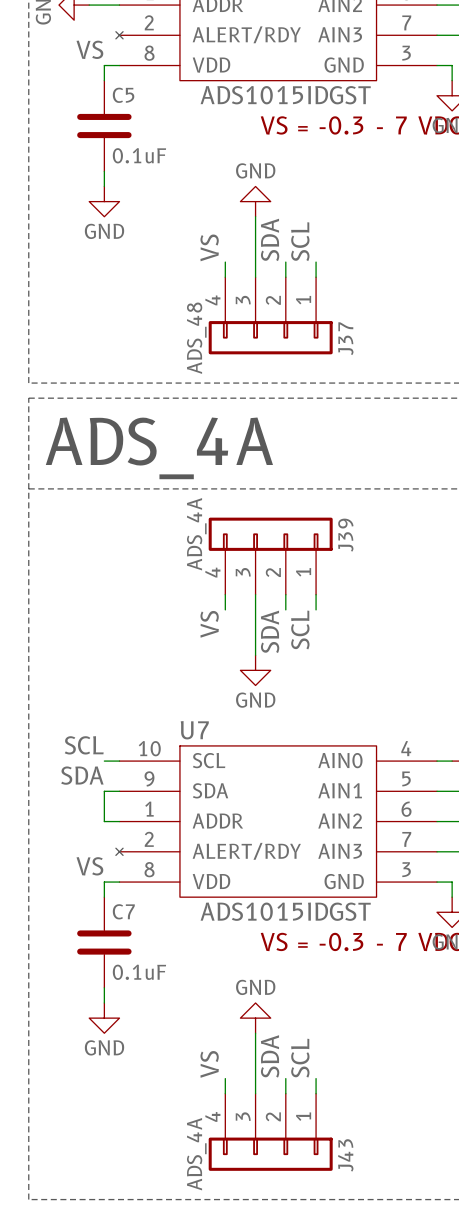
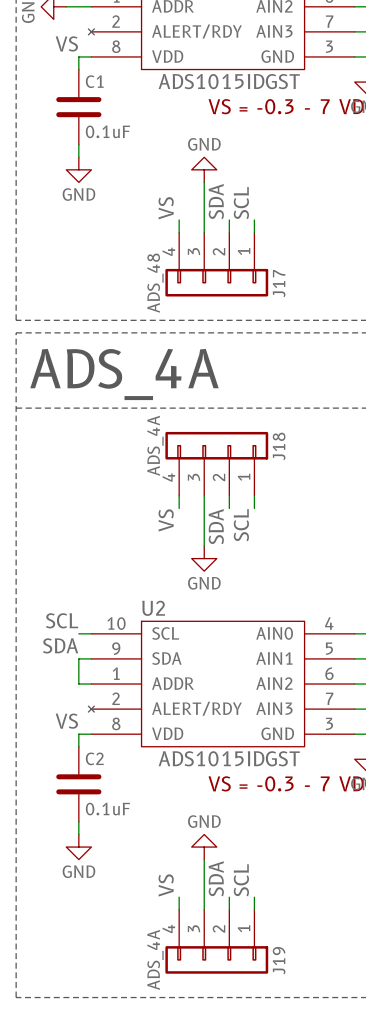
C5 name: C5 (123, 95) -> C1 (94, 81)
J37 name: J37 (345, 338) -> J17 (279, 283)
J39 name: J39 (345, 535) -> J18 (279, 446)
U7 name: U7 (194, 730) -> U2 (153, 608)
C7 name: C7 (123, 911) -> C2 (94, 758)
J43 name: J43 (345, 1155) -> J19 (279, 960)

